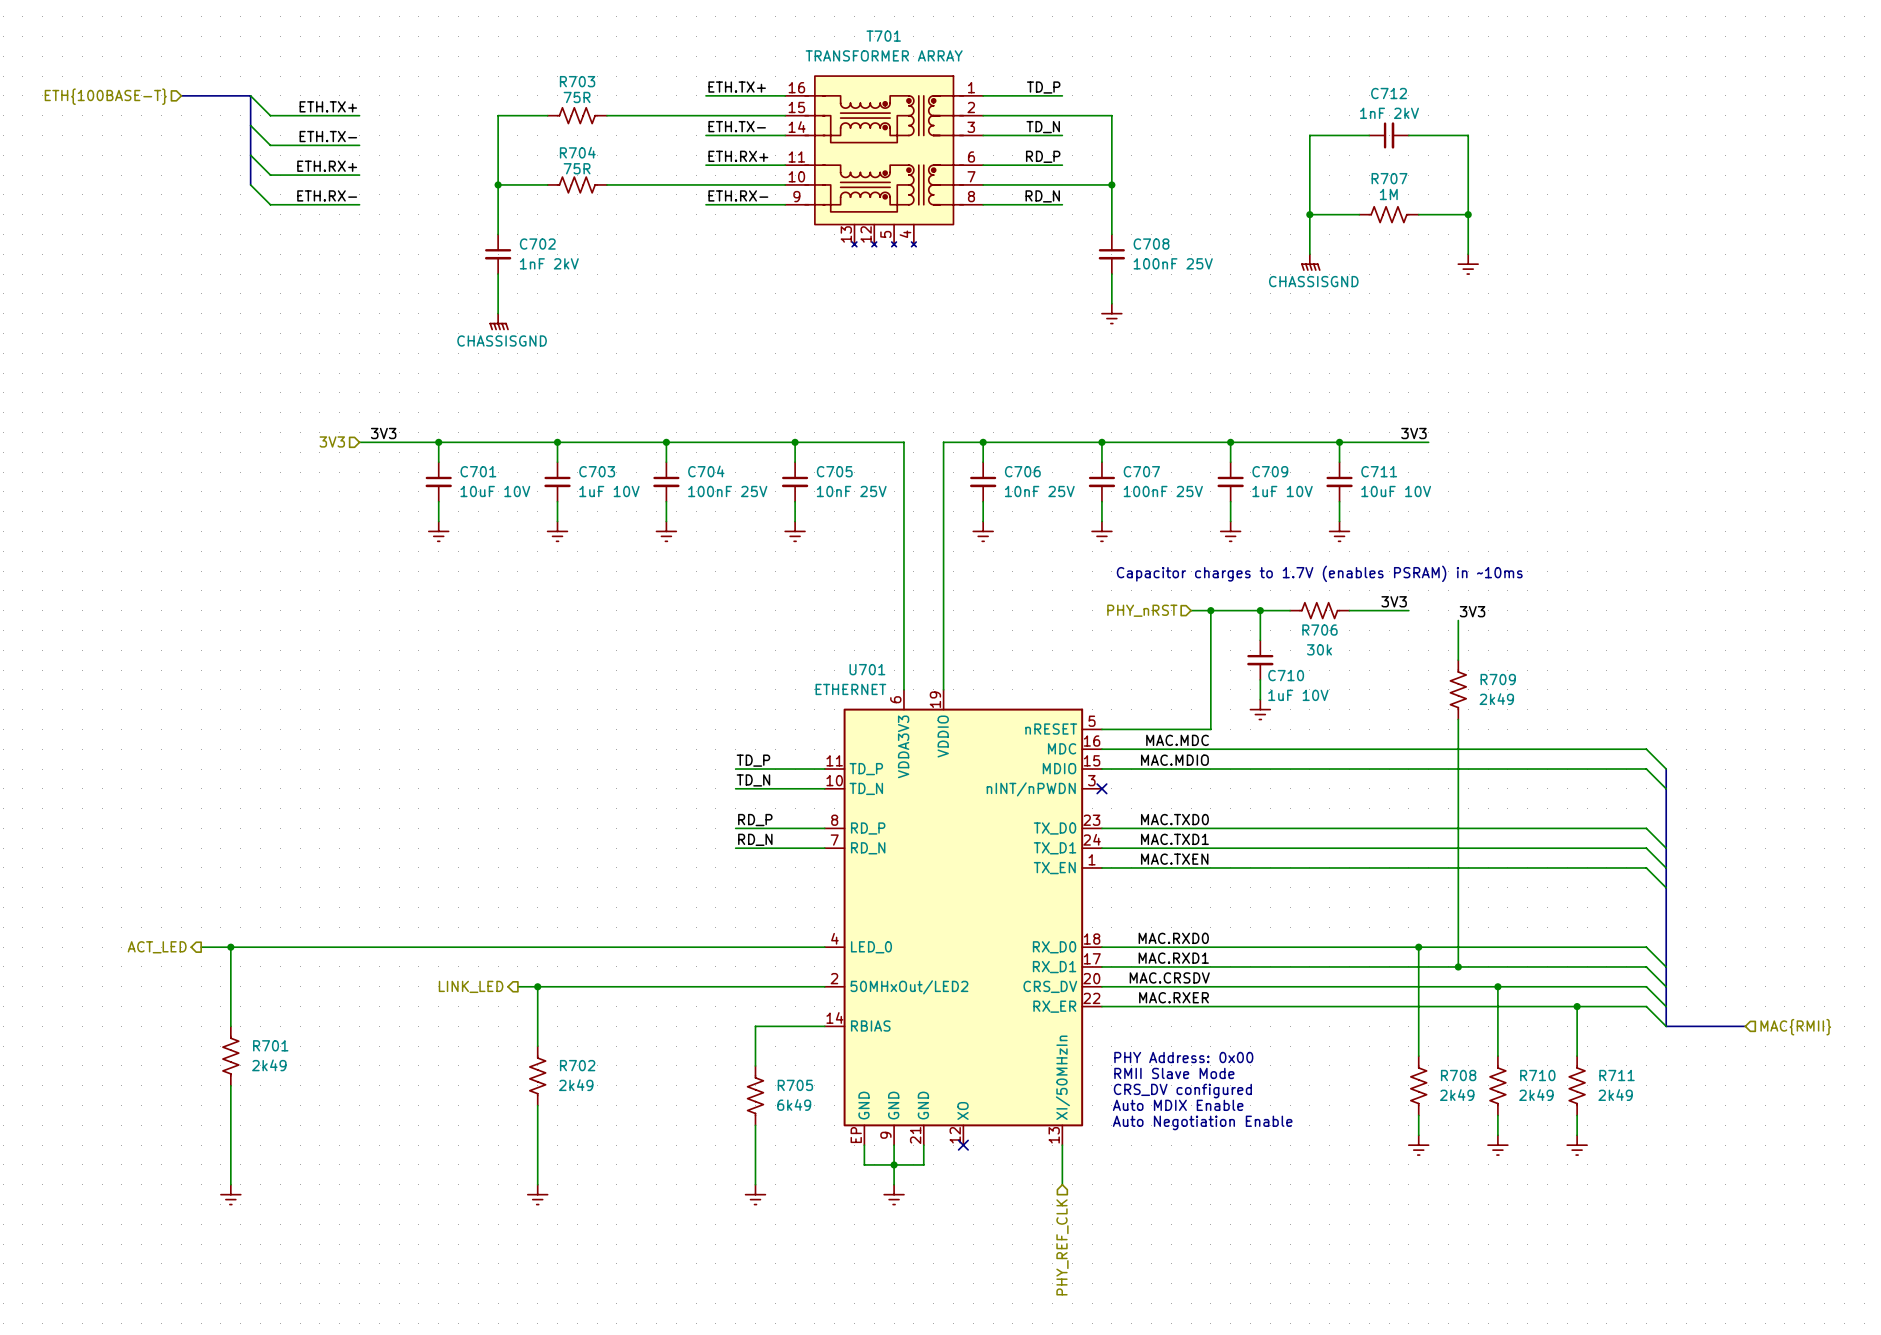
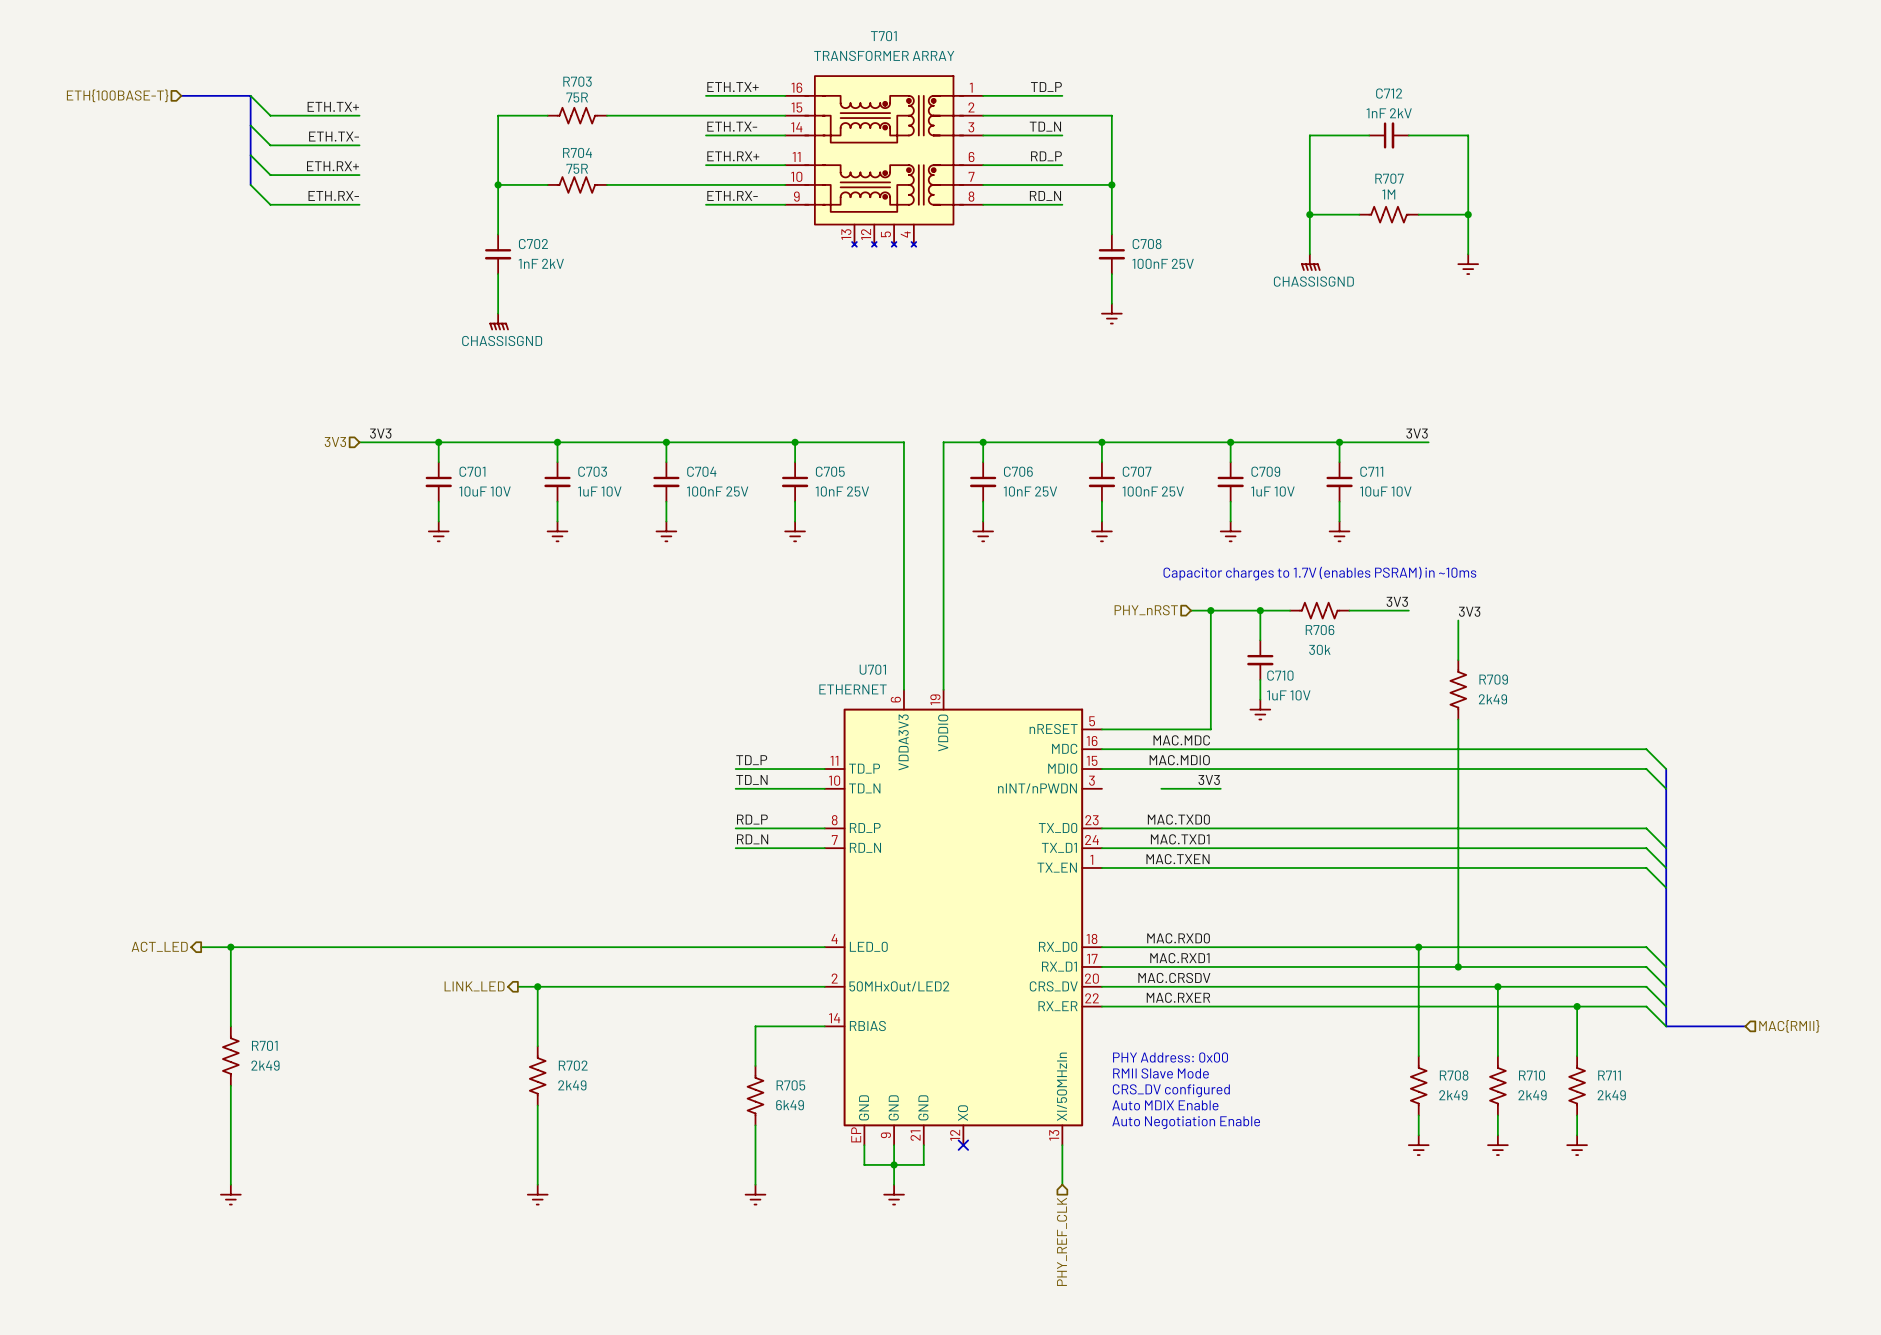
label: none -> 3V3 (1209, 780)
no-connect mark: (1101, 788) -> none
wire: none -> (1161, 788) (1220, 788)

